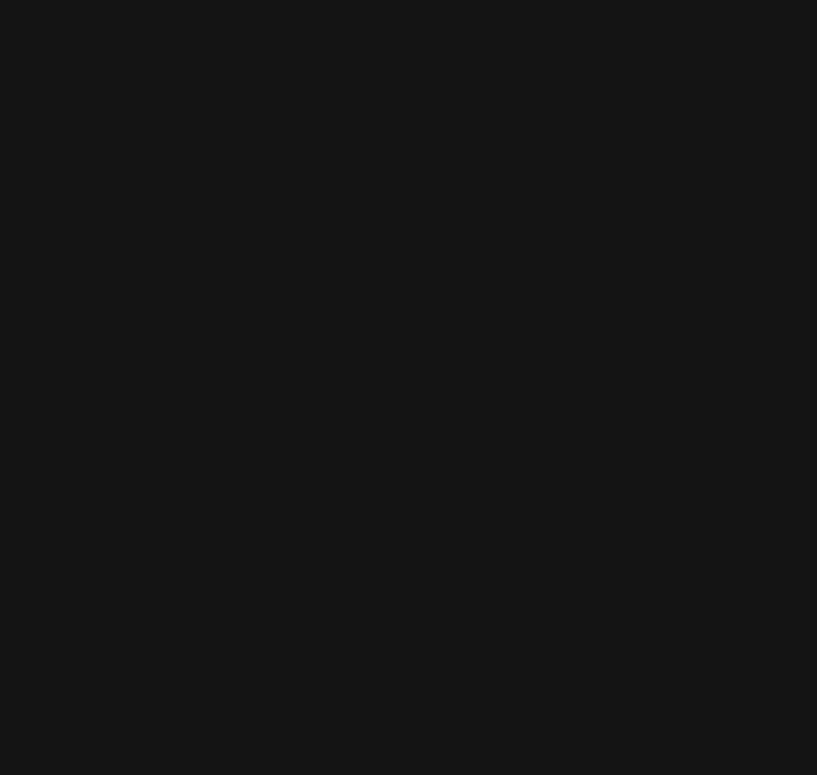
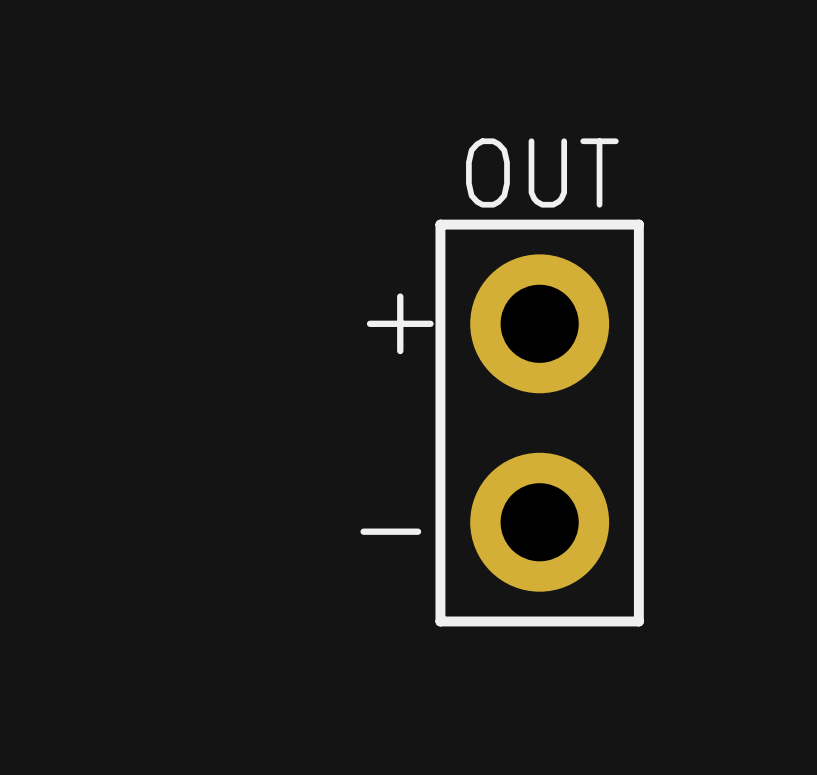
OUT: none -> (539, 423)

